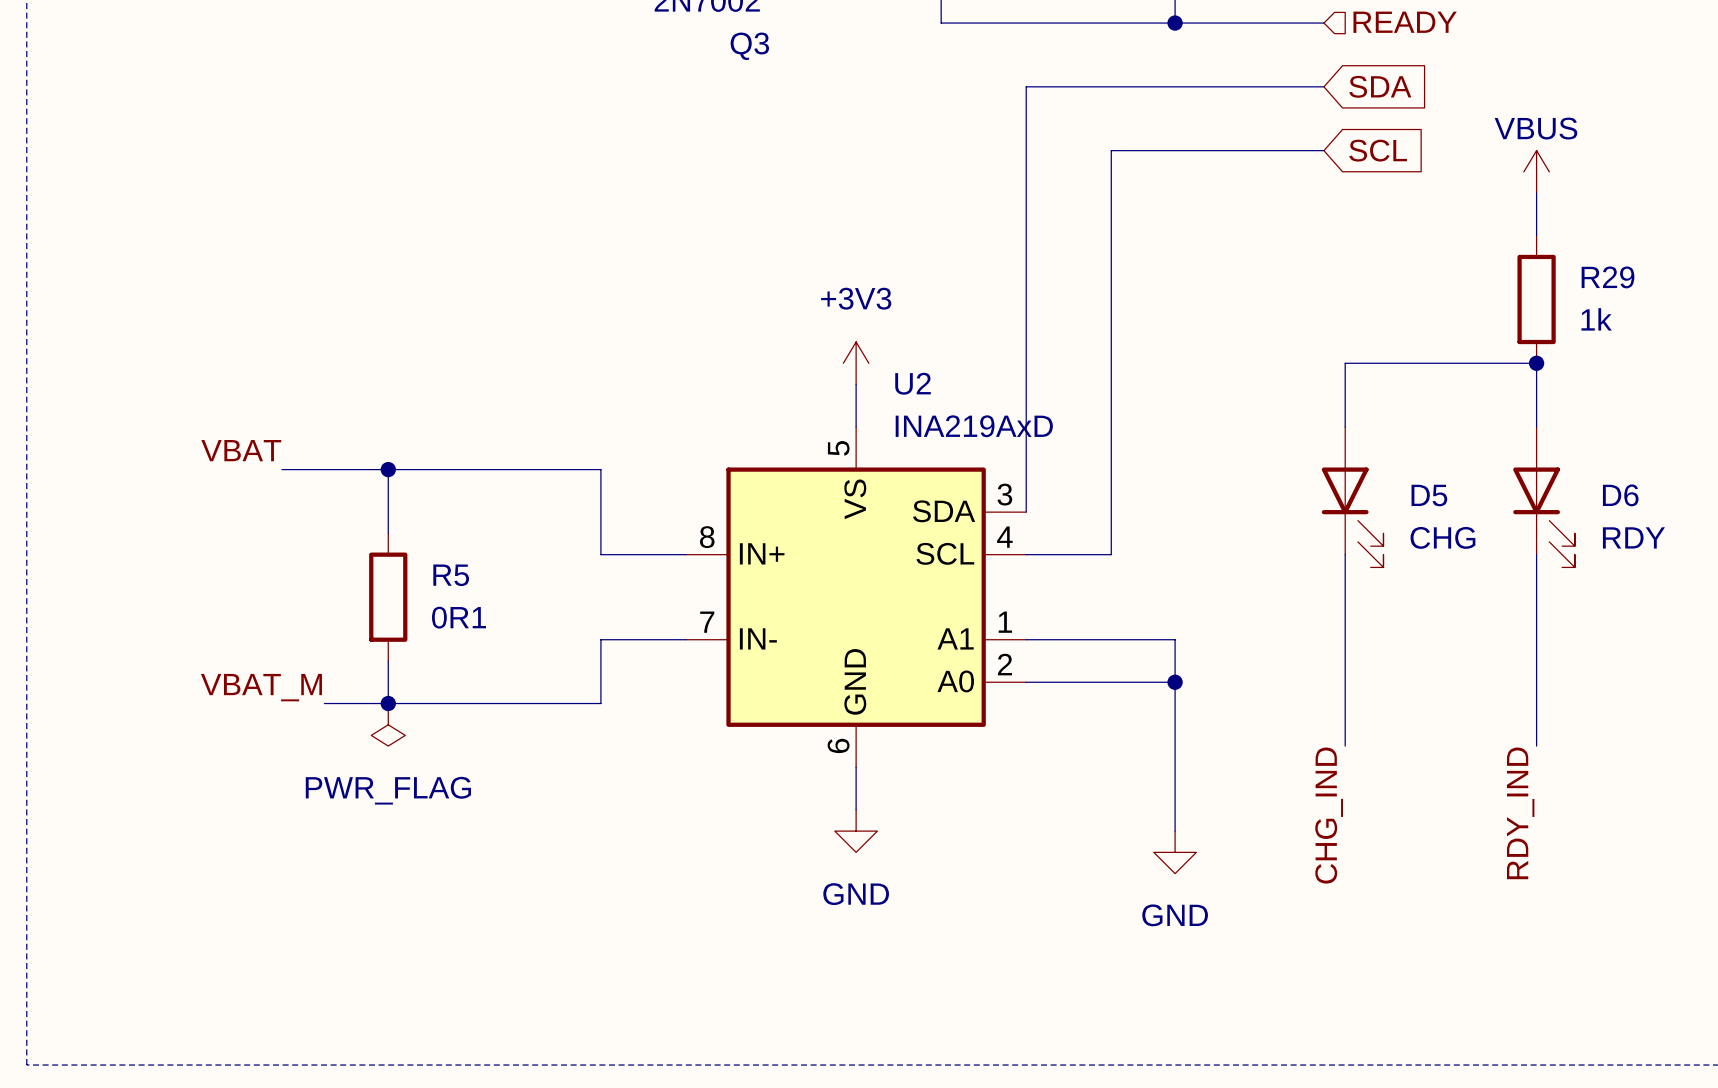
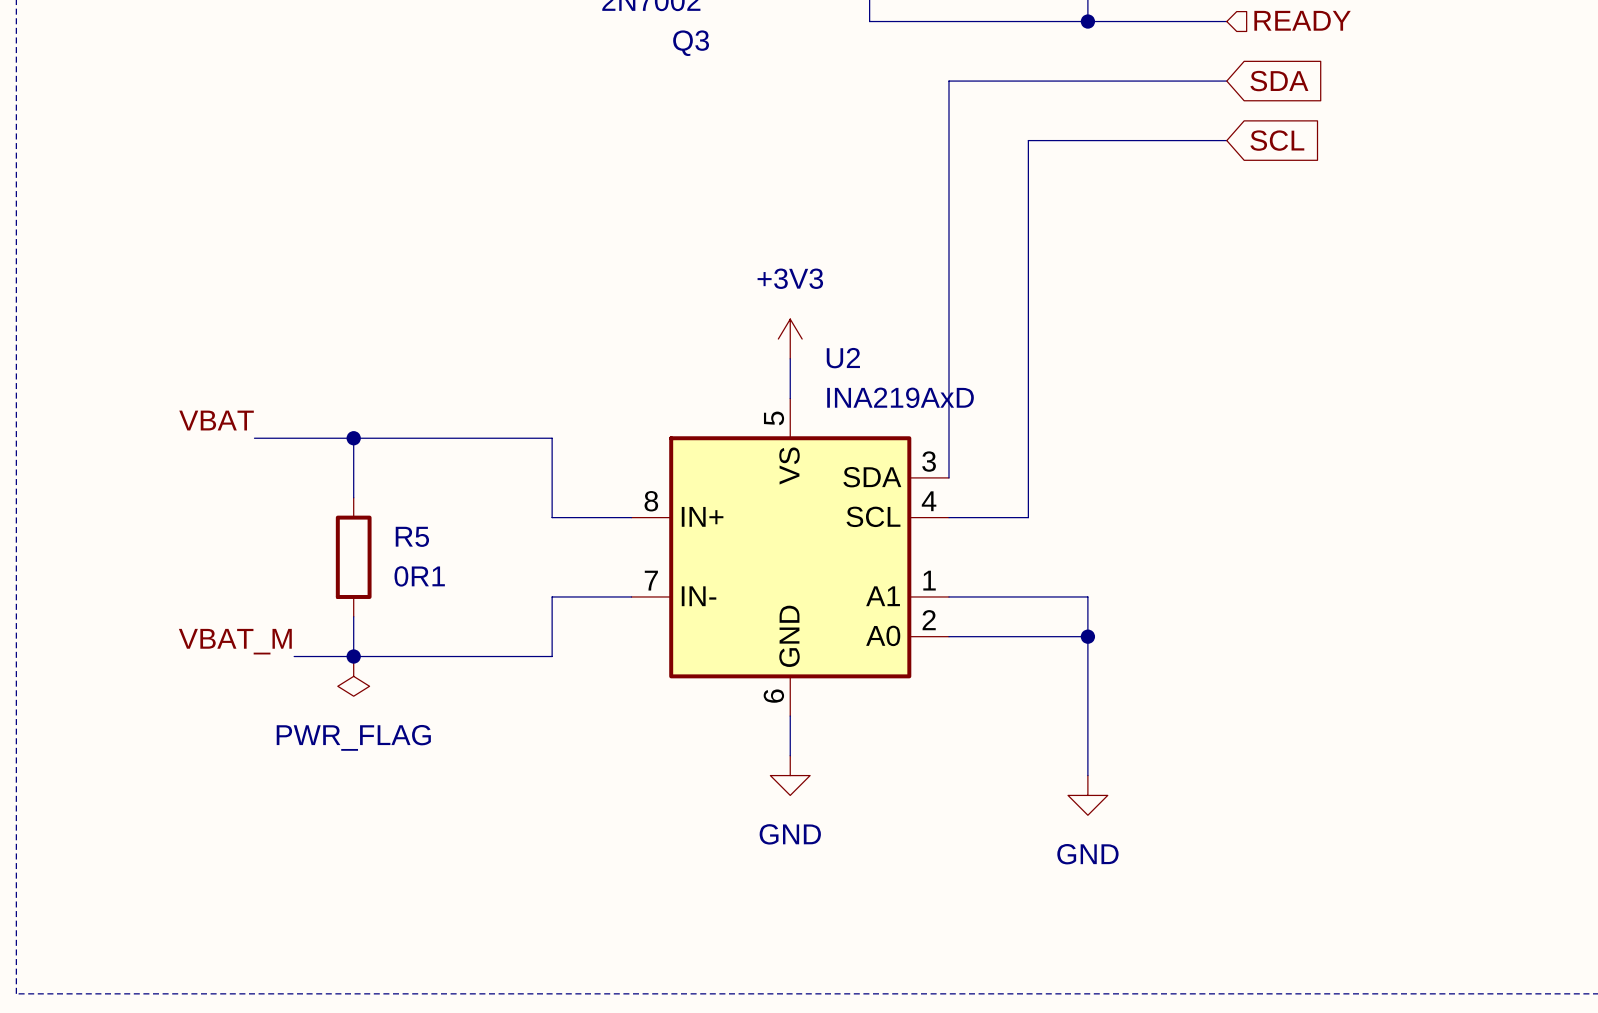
power symbol: VBUS (1536, 171) -> none
wire: (1536, 193) (1536, 235) -> none
R29: 1k (1536, 299) -> none
junction: (1536, 363) -> none
wire: (1345, 427) (1345, 363) (1536, 363) (1536, 427) -> none
D5: CHG (1352, 497) -> none
D6: RDY (1544, 497) -> none
wire: (1345, 554) (1345, 746) -> none
wire: (1536, 554) (1536, 746) -> none
label: RDY_IND (1520, 813) -> none
label: CHG_IND (1329, 815) -> none

